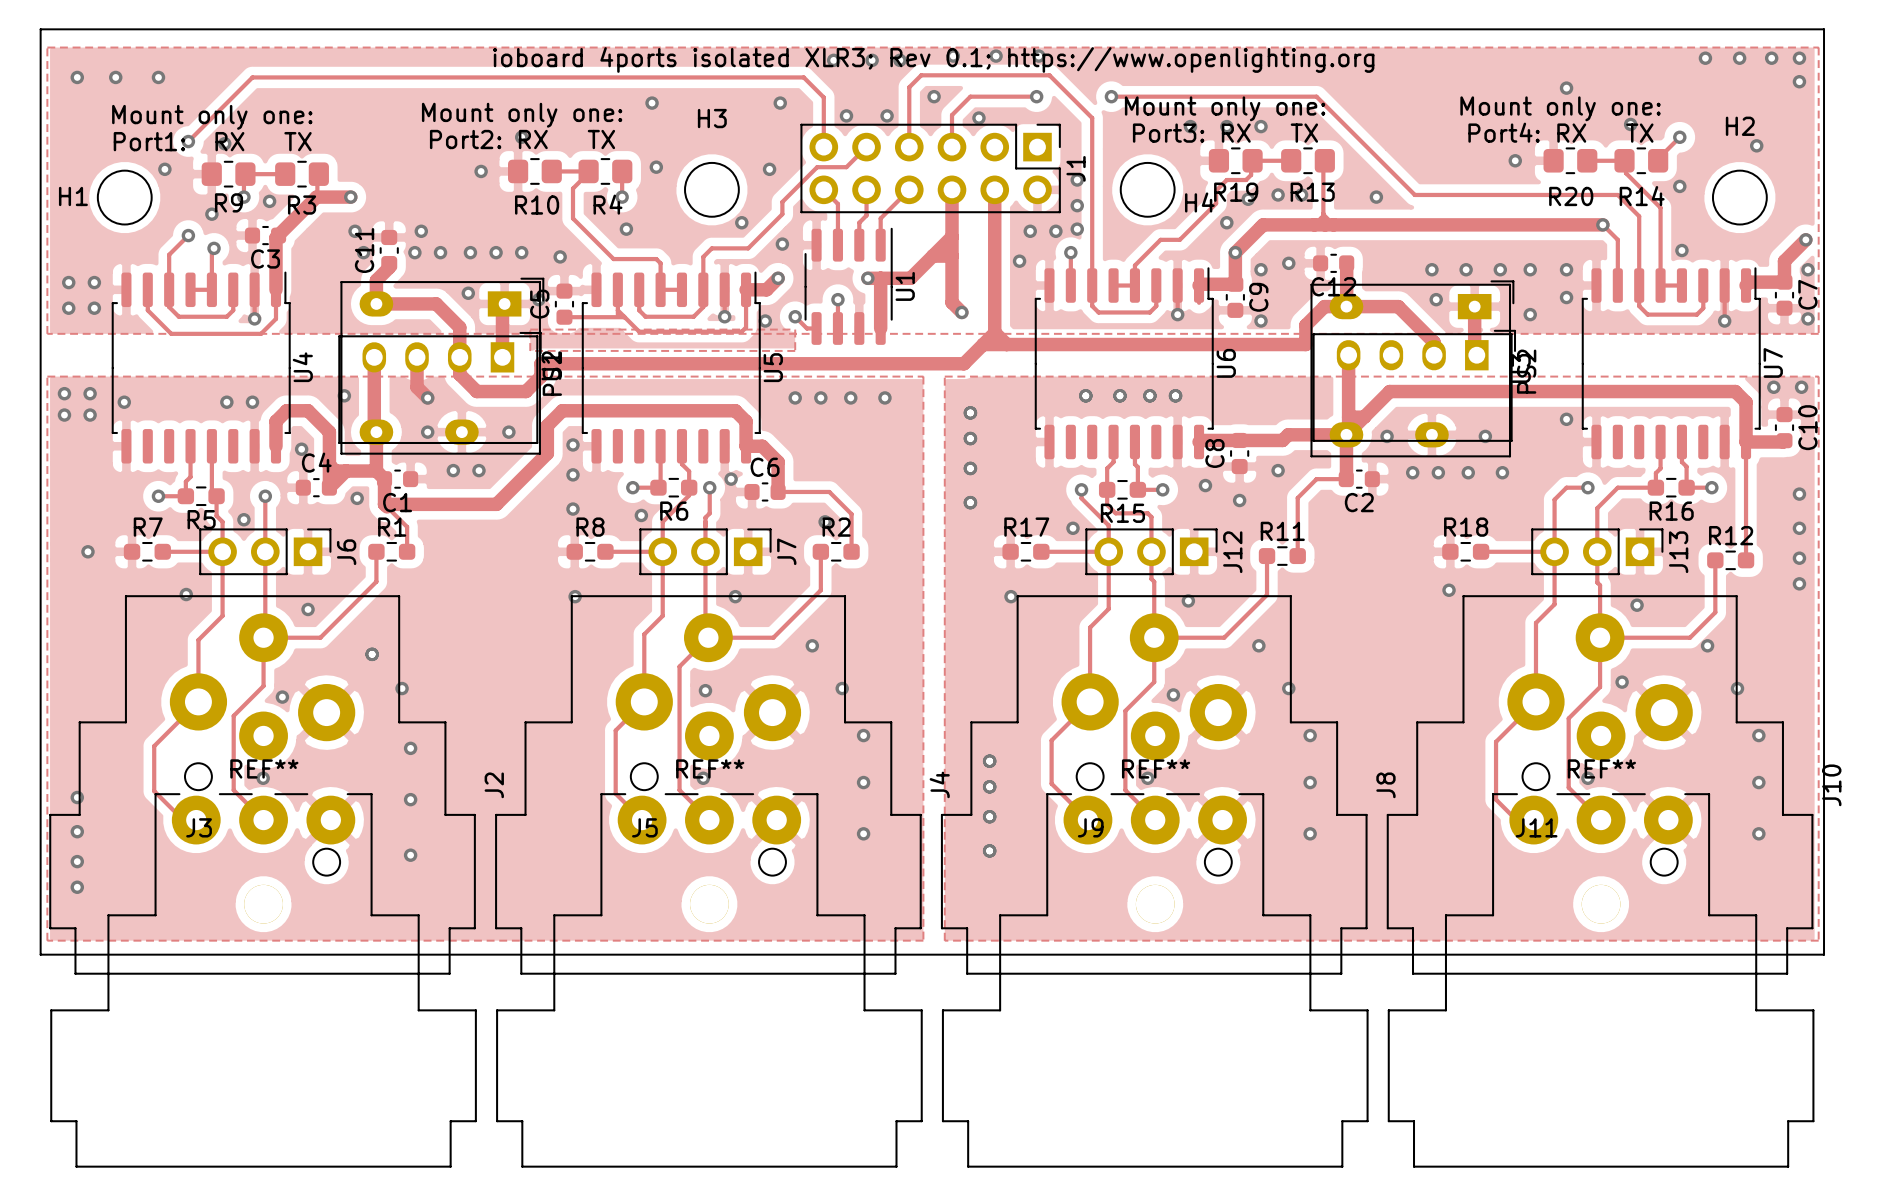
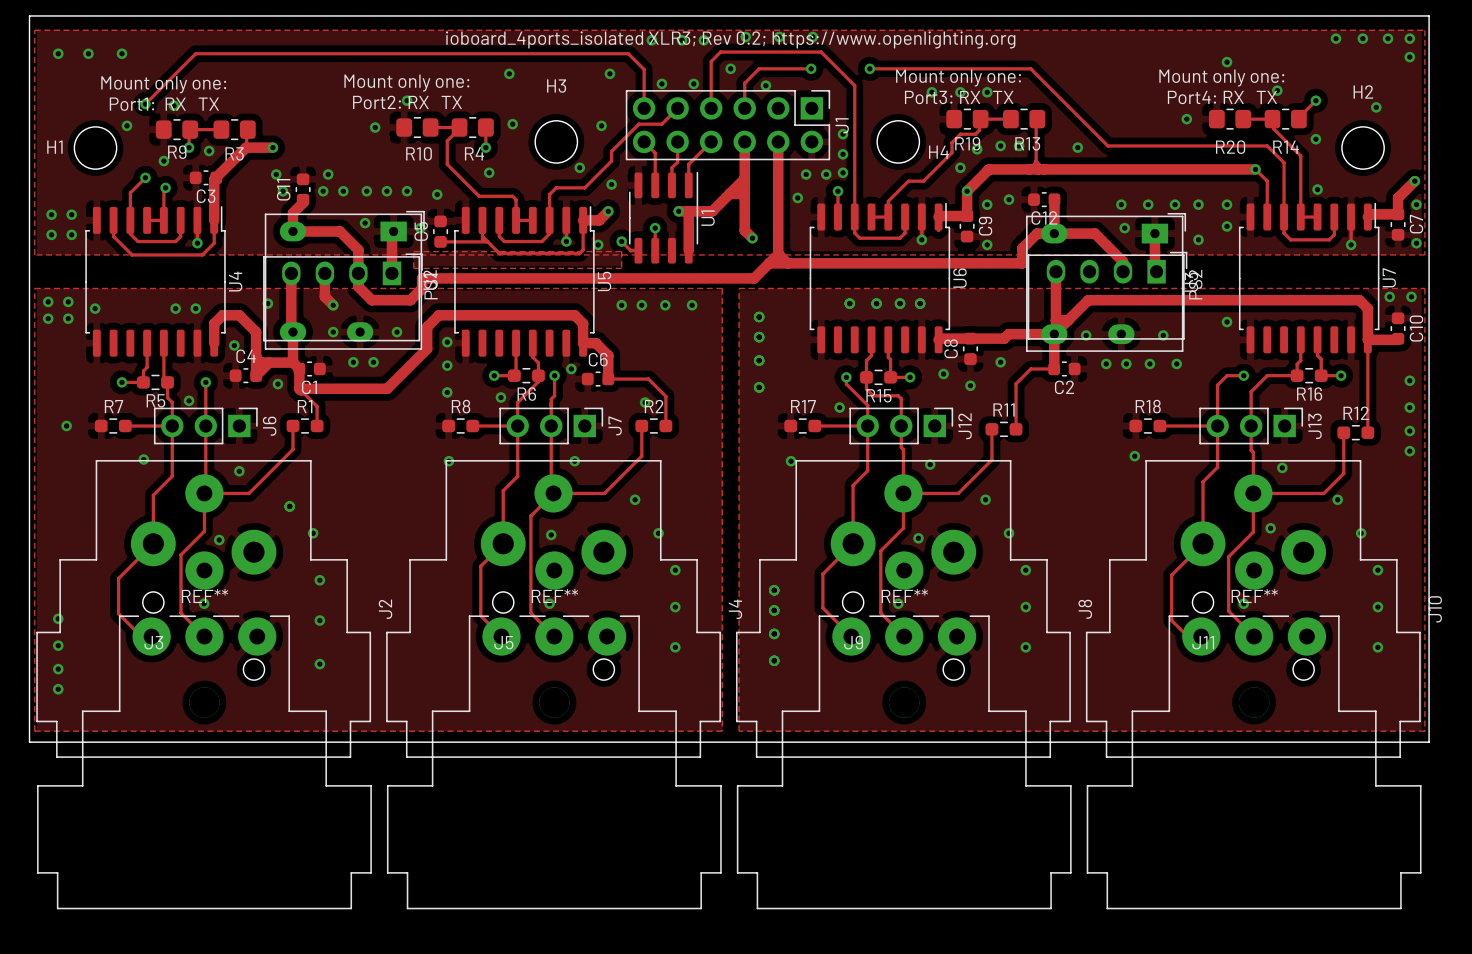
text: ioboard 4ports isolated XLR3; Rev 0.1; https://www.openlighting.org (933, 59) -> ioboard_4ports_isolated XLR3; Rev 0.2; https://www.openlighting.org (730, 39)

